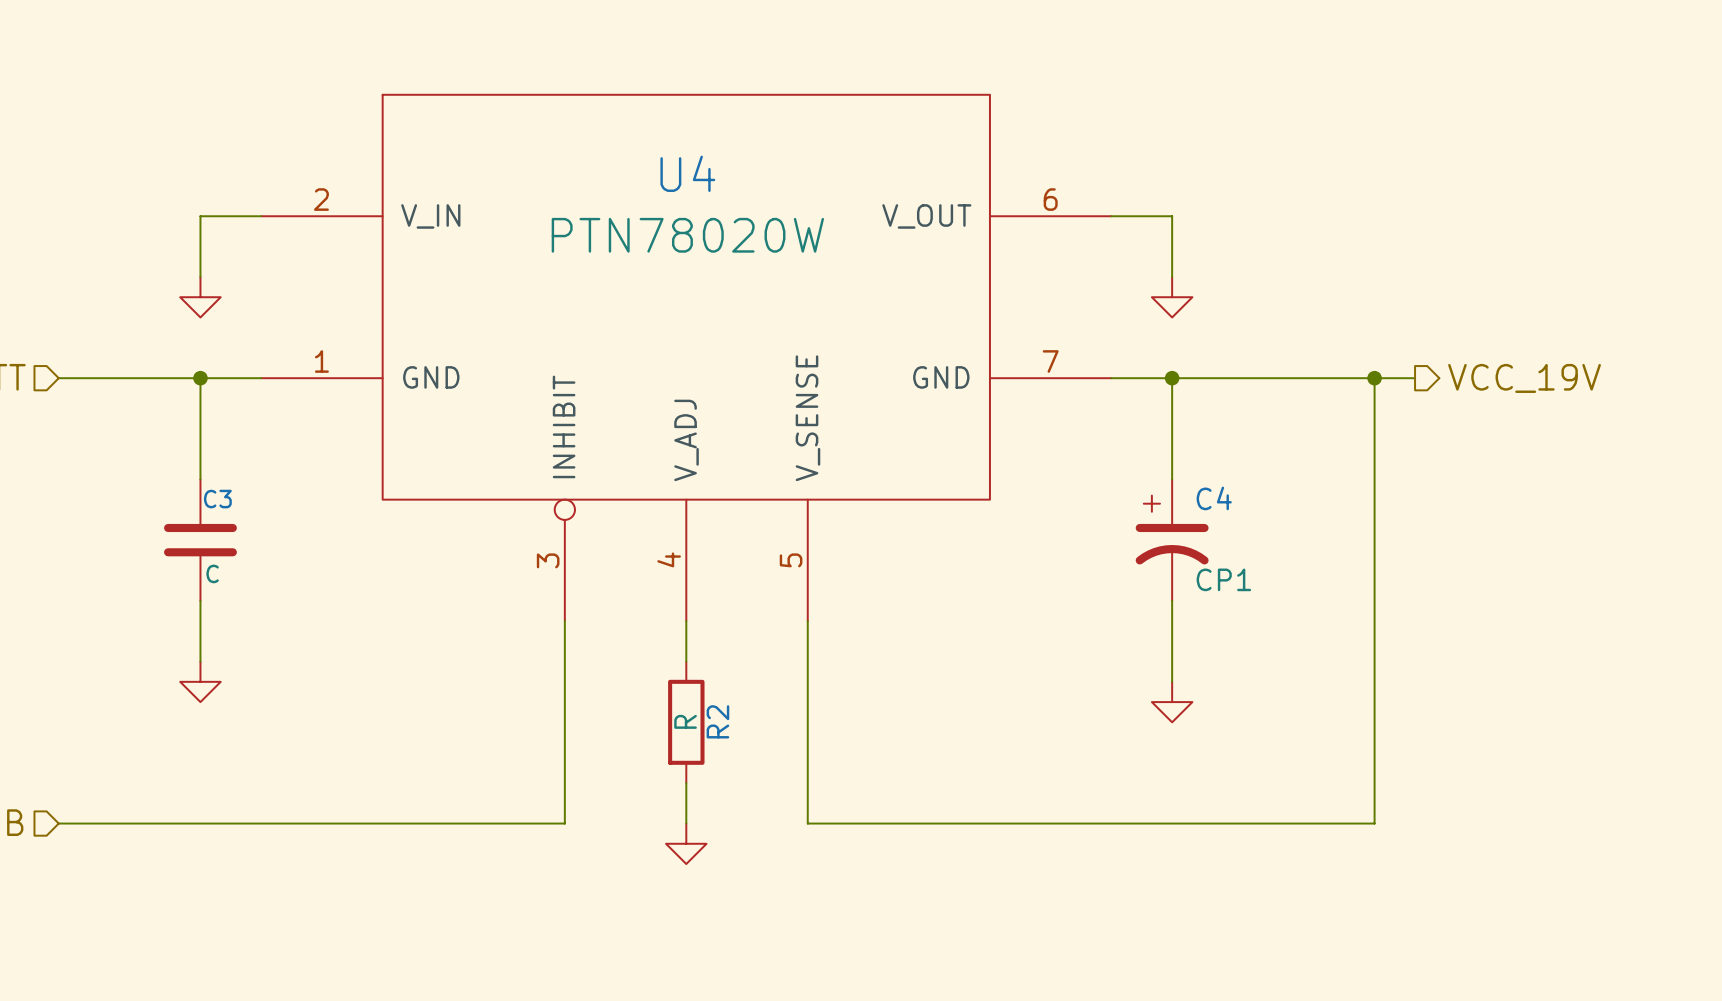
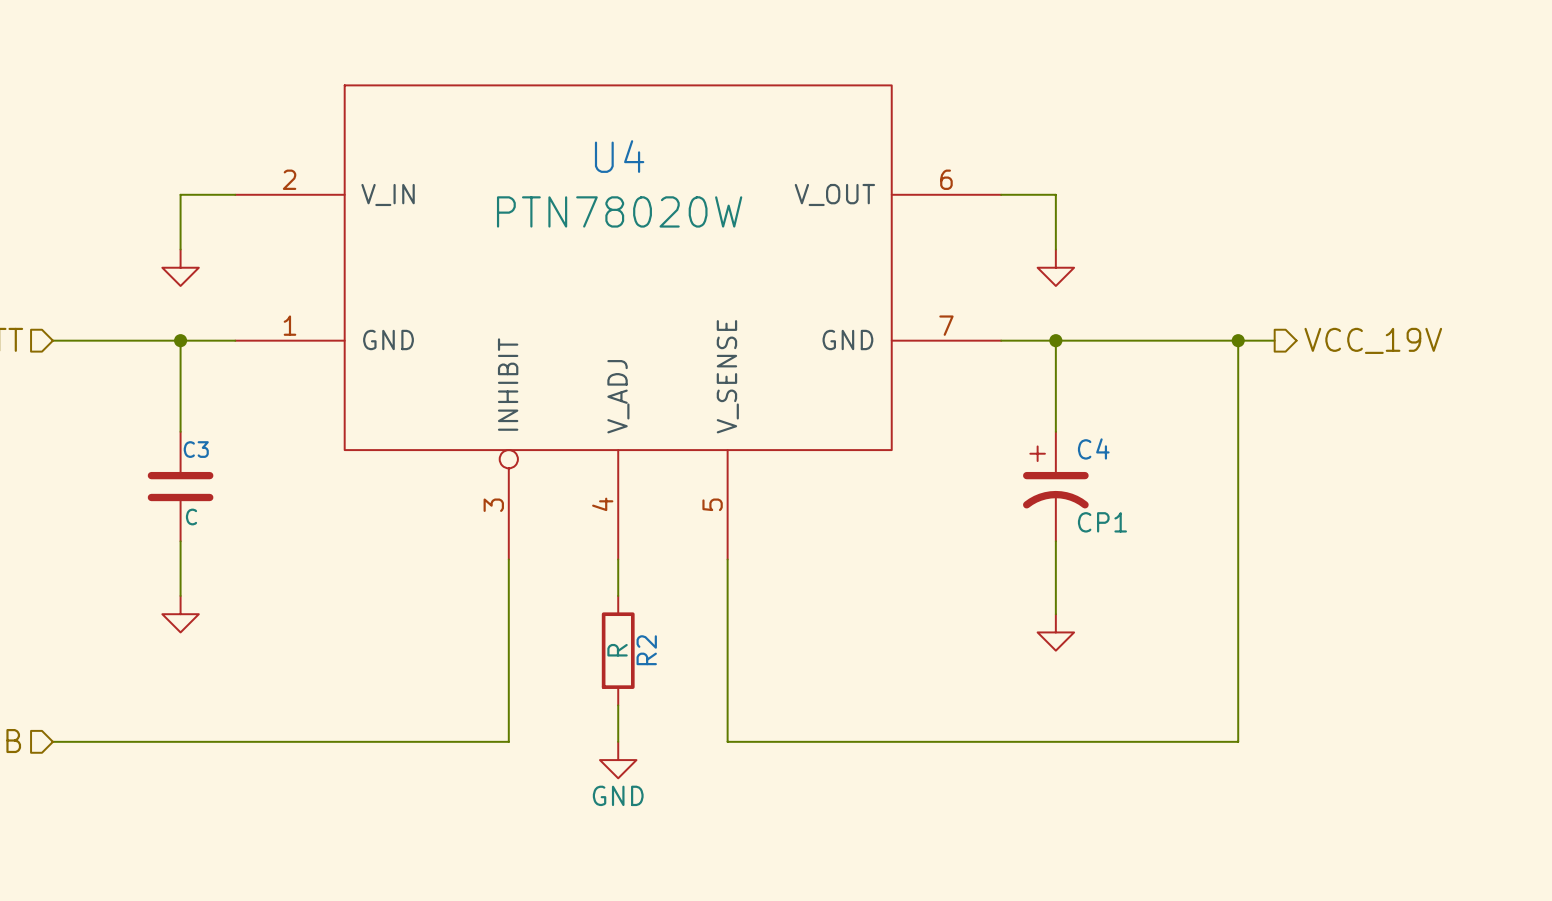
power symbol text: none -> GND (618, 795)

